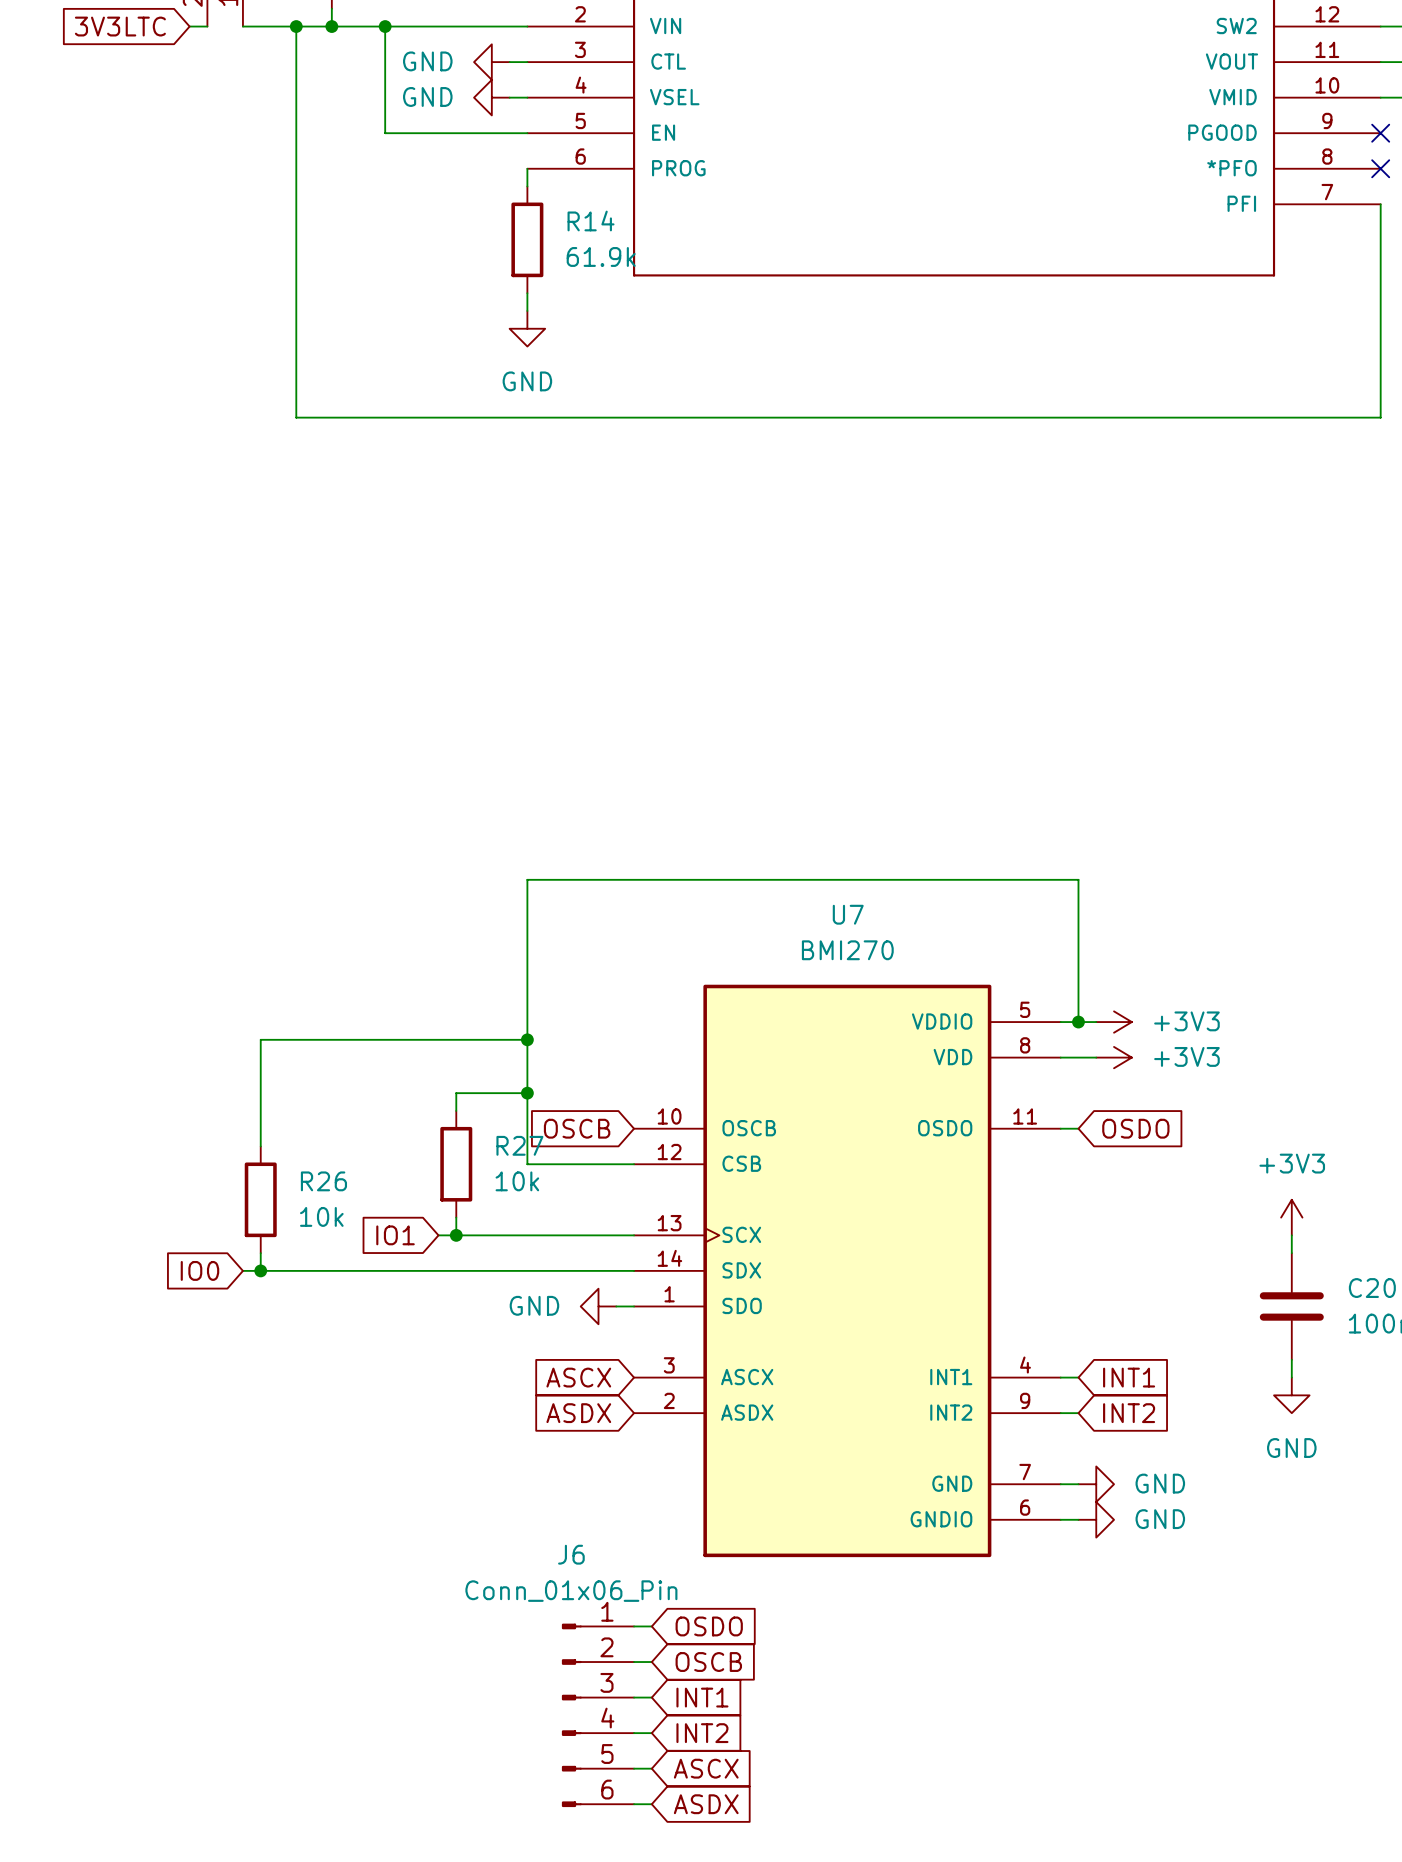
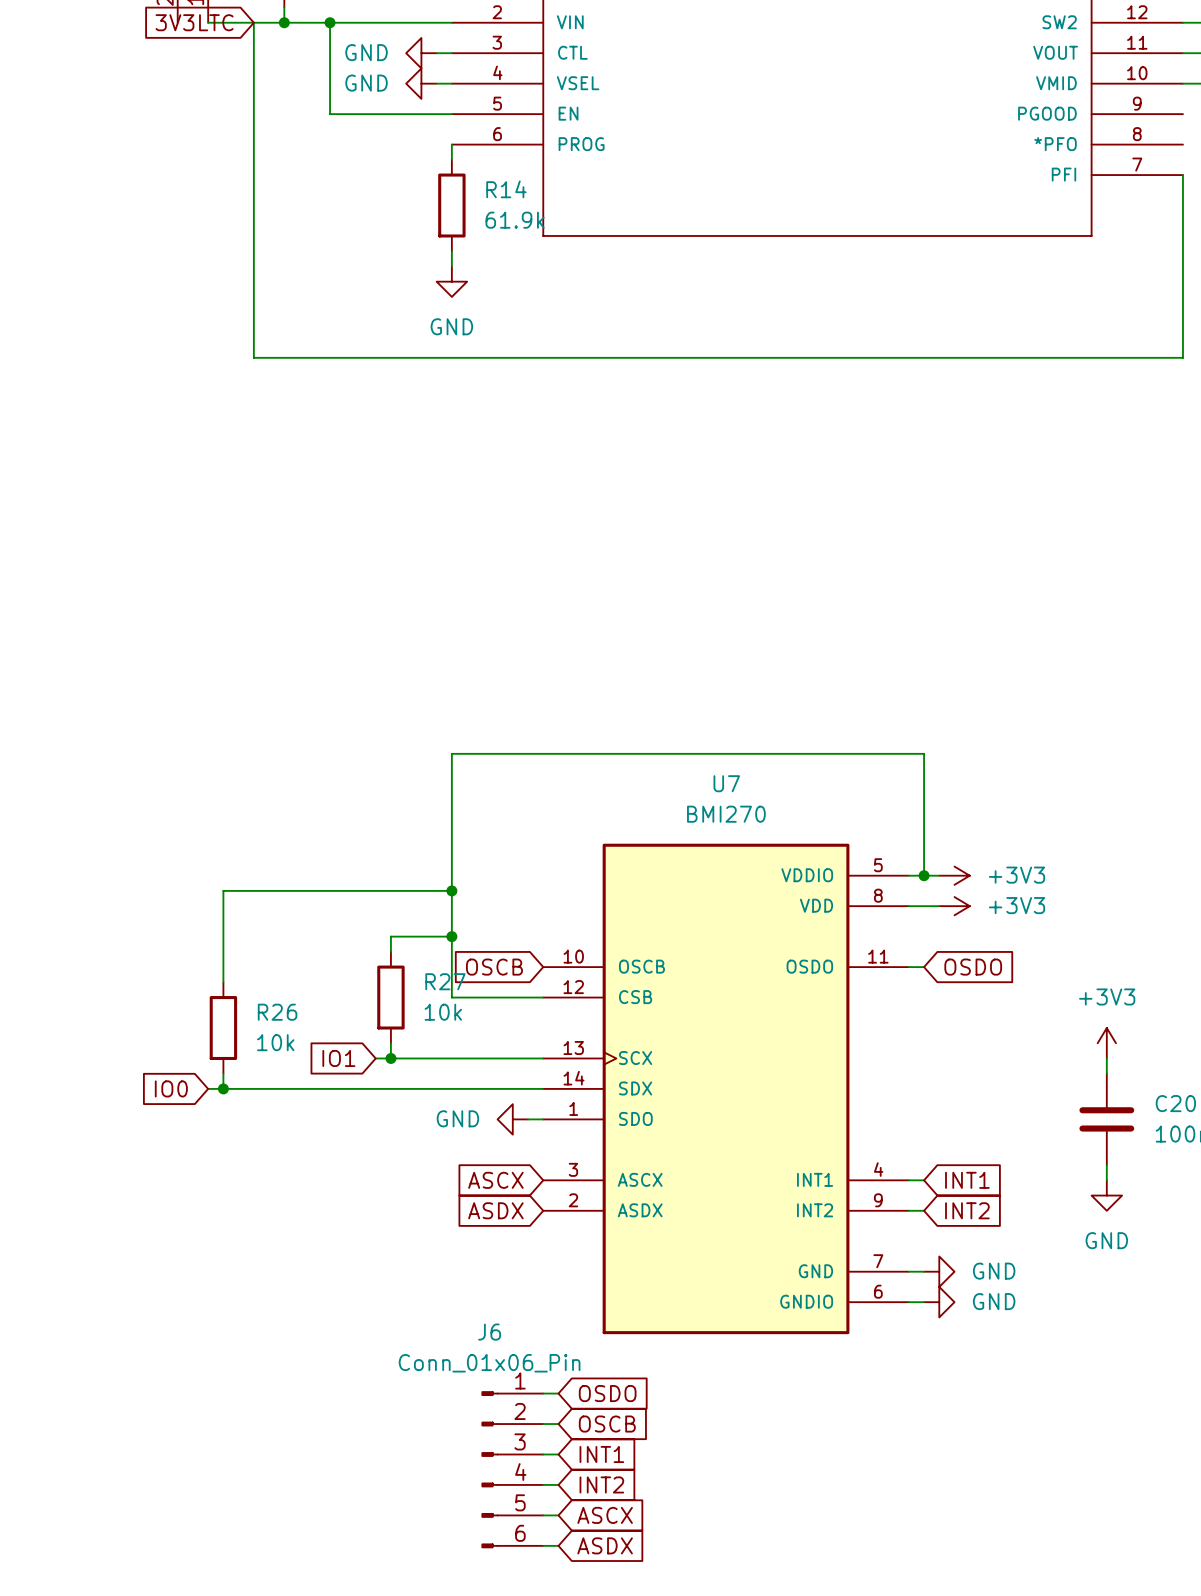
global label position: 3V3LTC (120, 26) -> 3V3LTC (194, 22)
wire: (189, 26) (207, 26) -> none
junction: (296, 26) -> none
no-connect mark: (1380, 133) -> none
no-connect mark: (1380, 168) -> none

